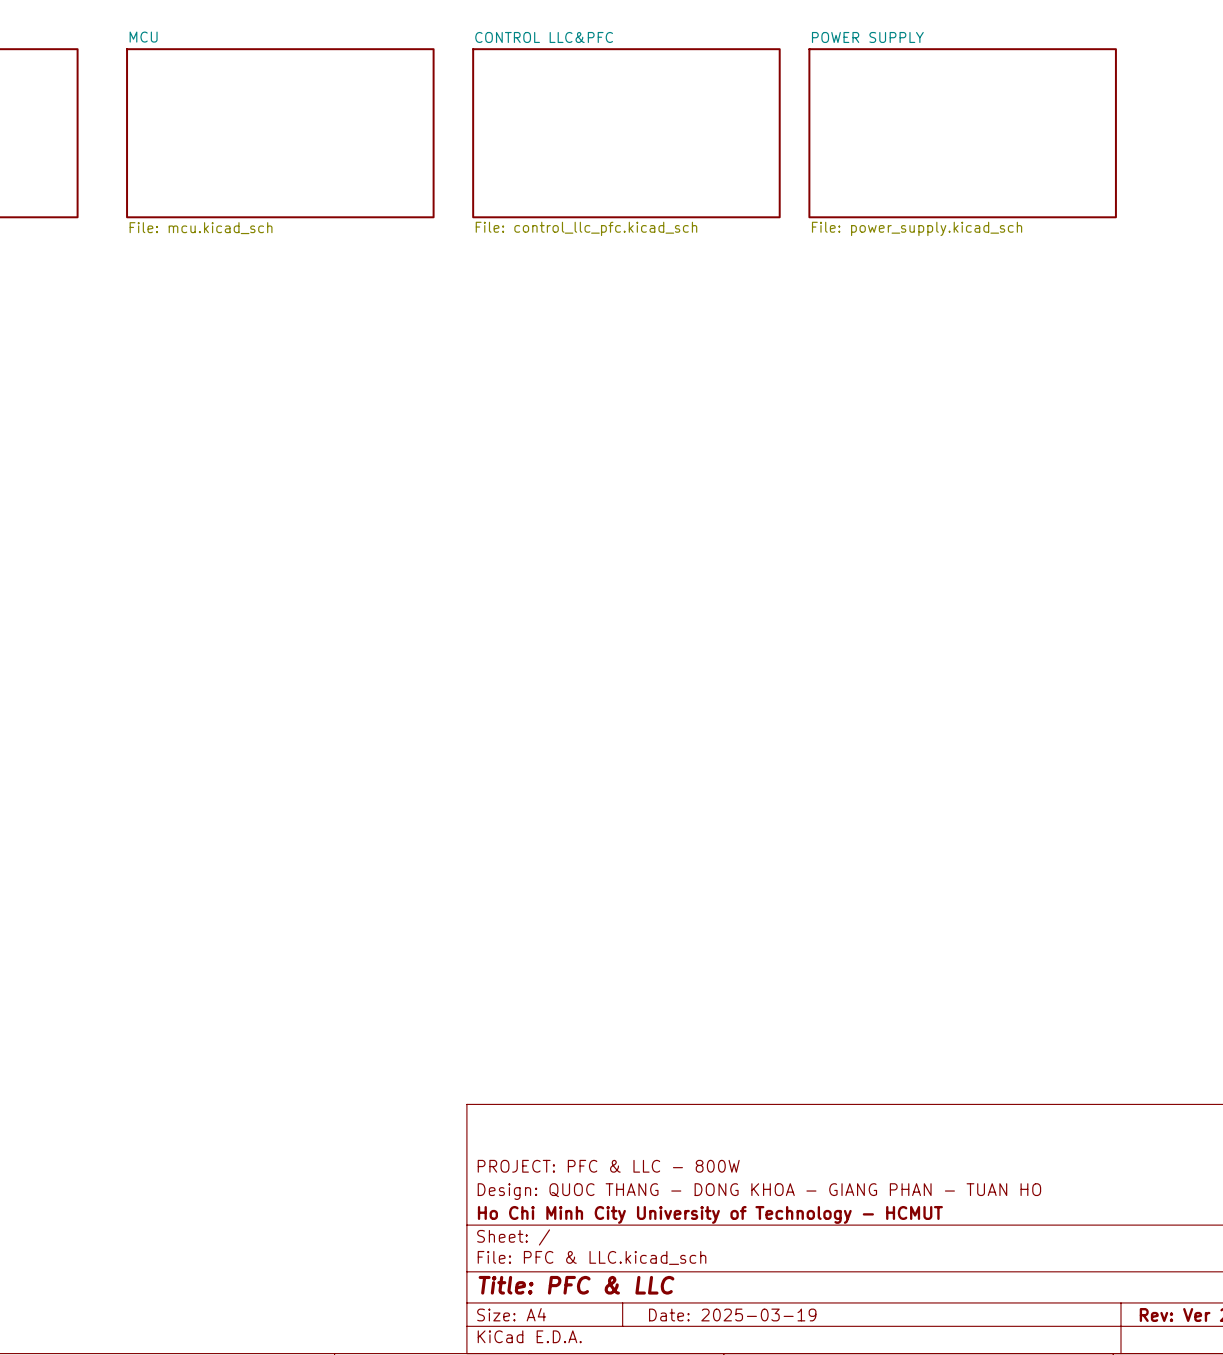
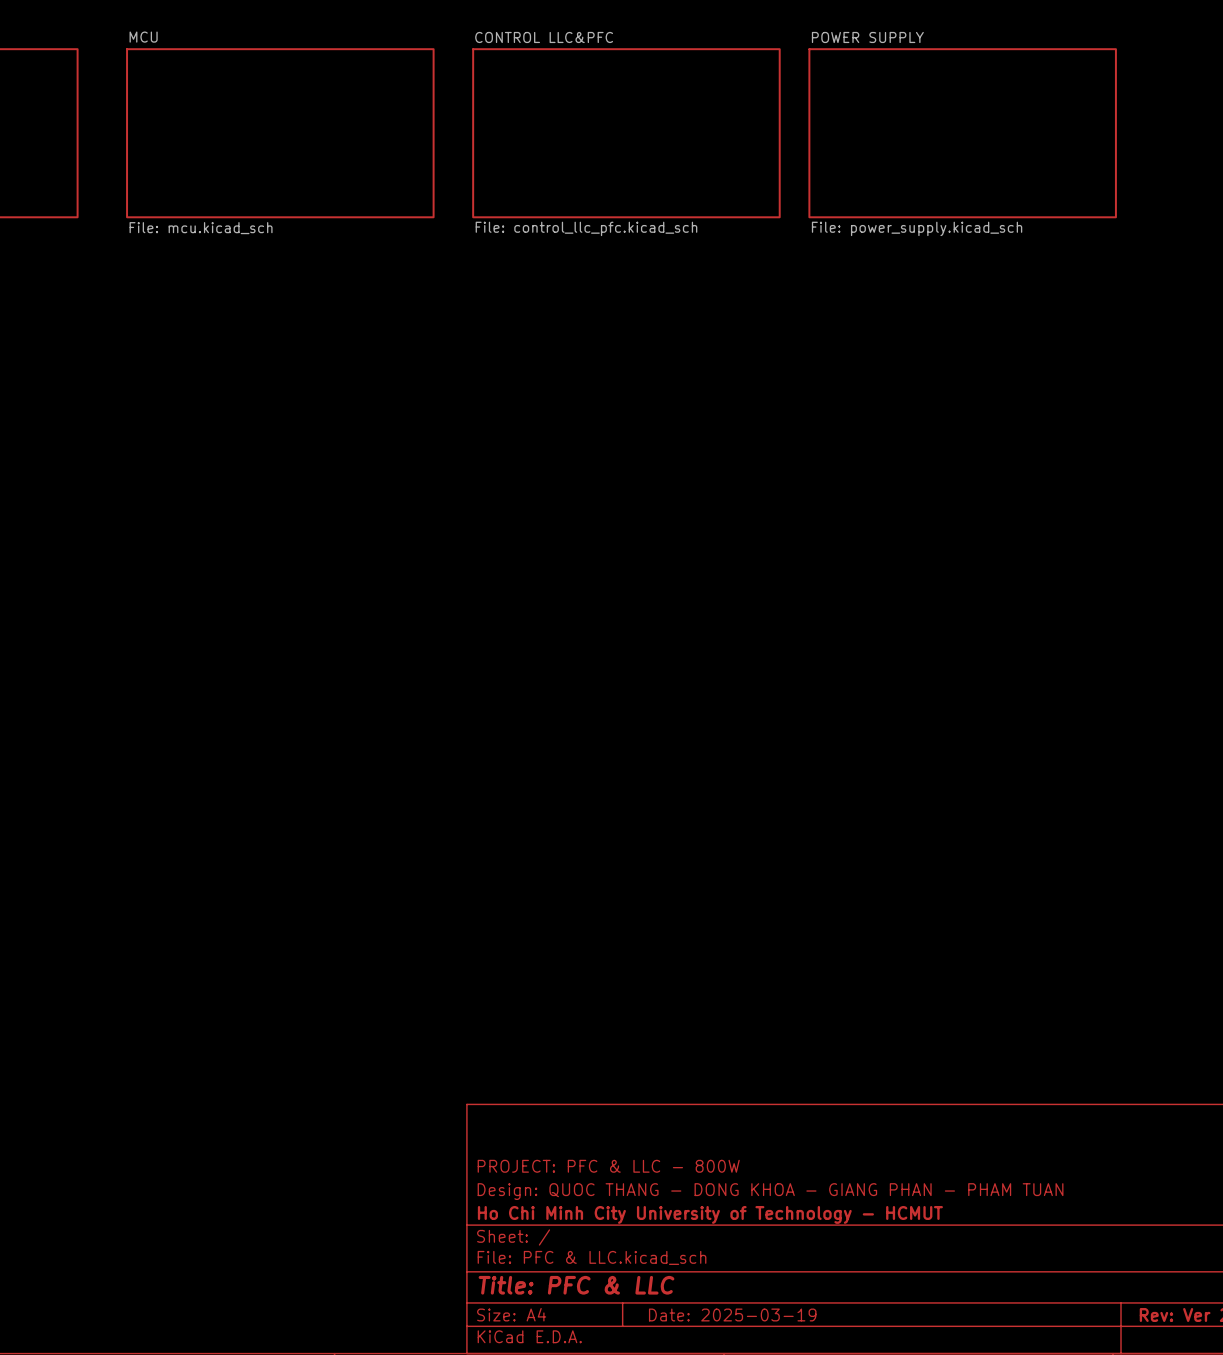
title block: Design: QUOC THANG - DONG KHOA - GIANG PHAN - TUAN HO (759, 1191) -> Design: QUOC THANG - DONG KHOA - GIANG PHAN - PHAM TUAN (770, 1191)

